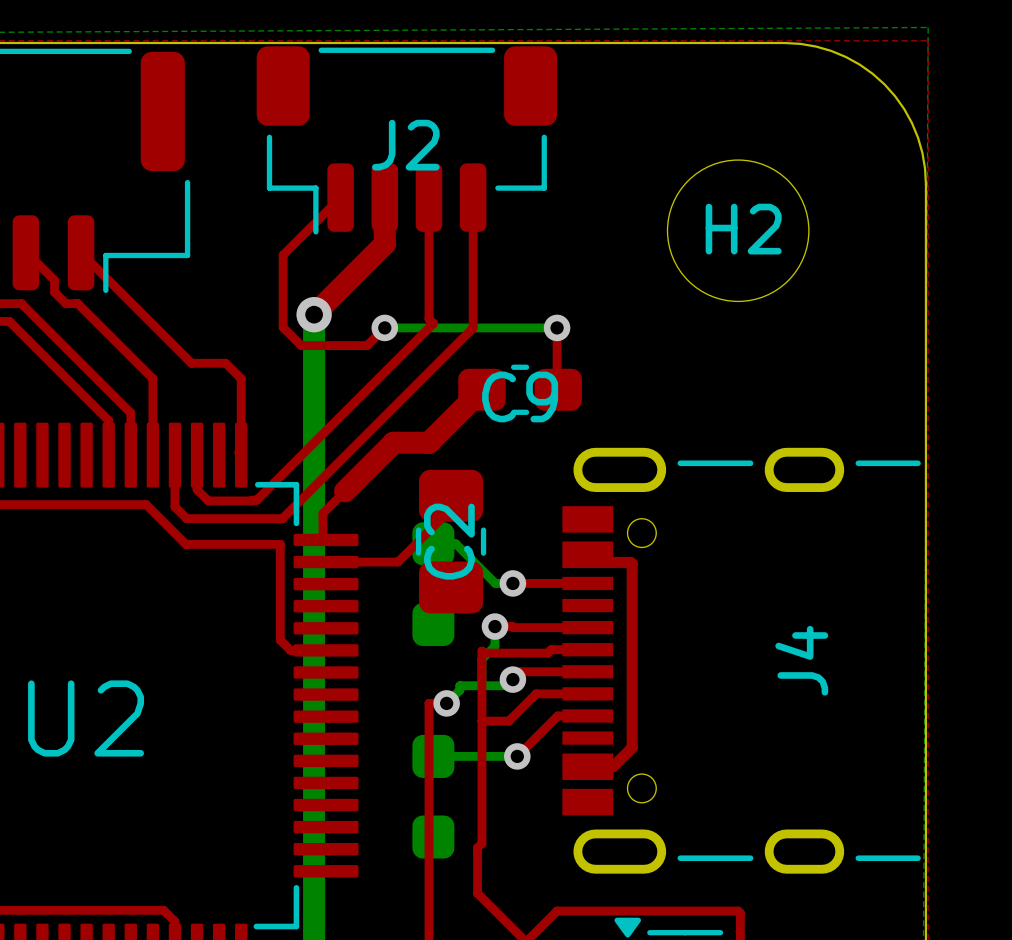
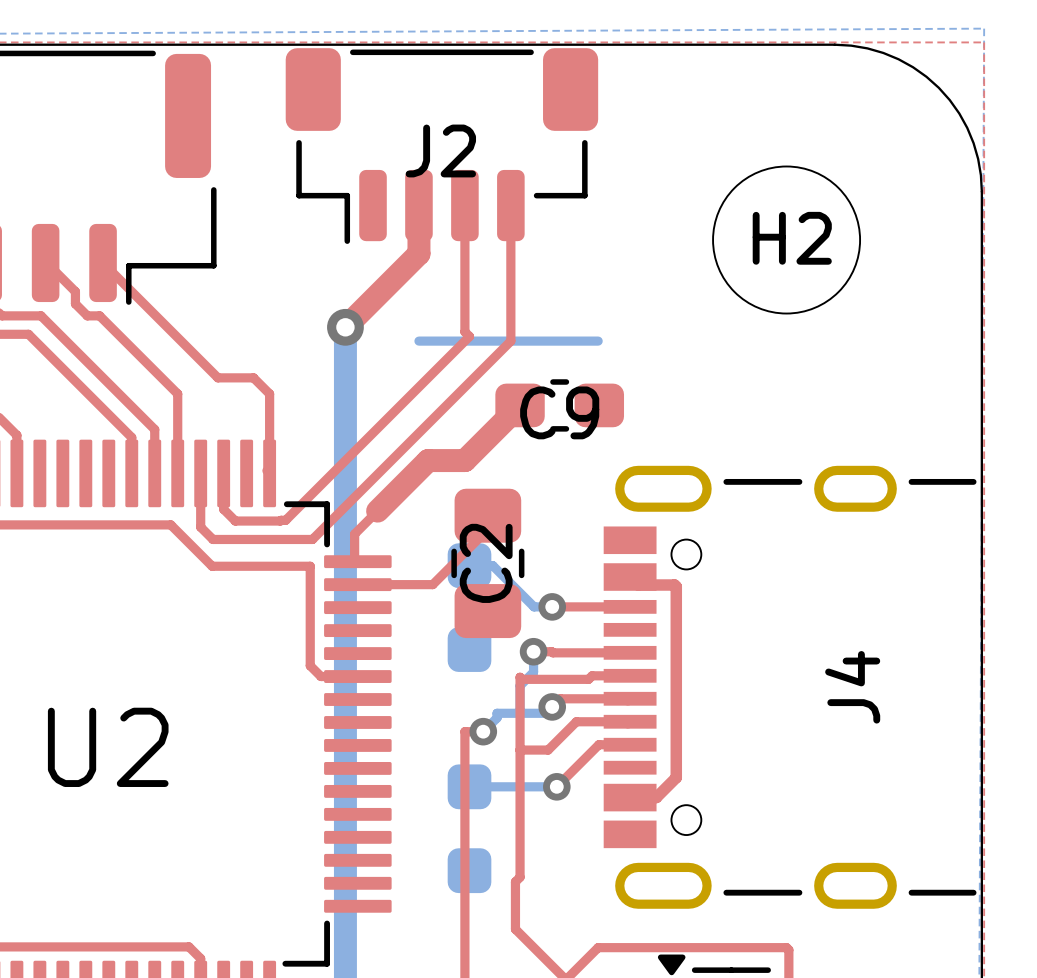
top track: (340, 197) (283, 255) (283, 327) (301, 345) (367, 345) (384, 327) -> none
via: (384, 327) -> none
top track: (557, 327) (557, 388) -> none
via: (557, 327) -> none

